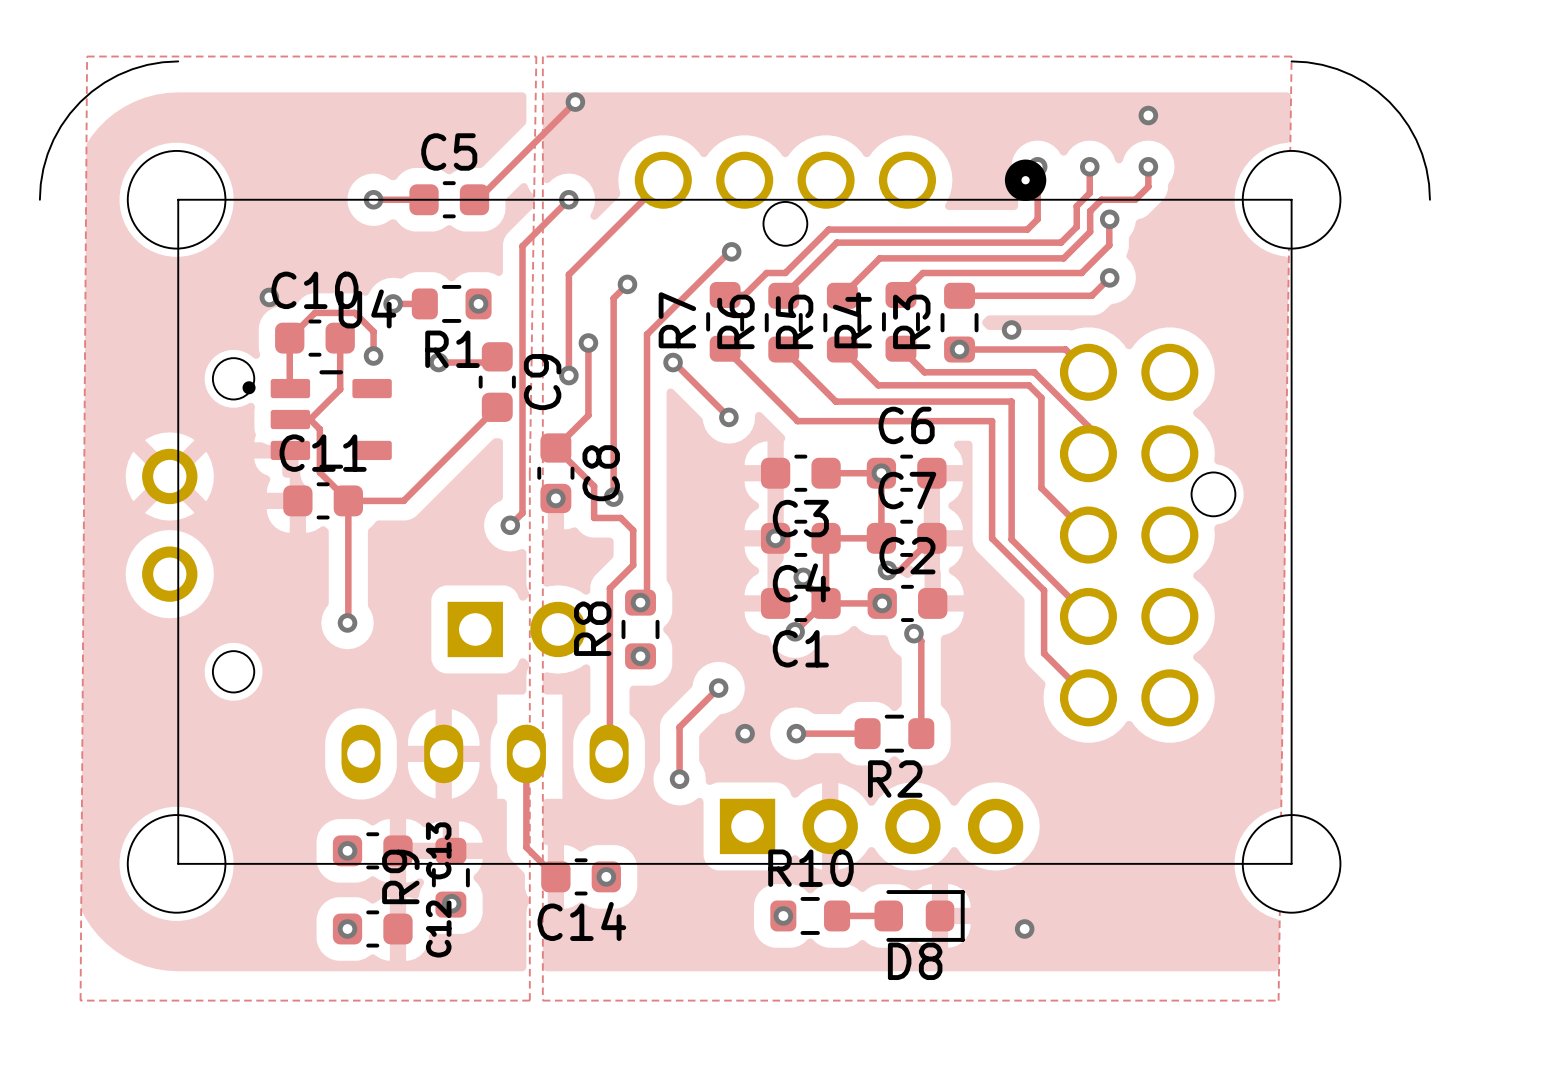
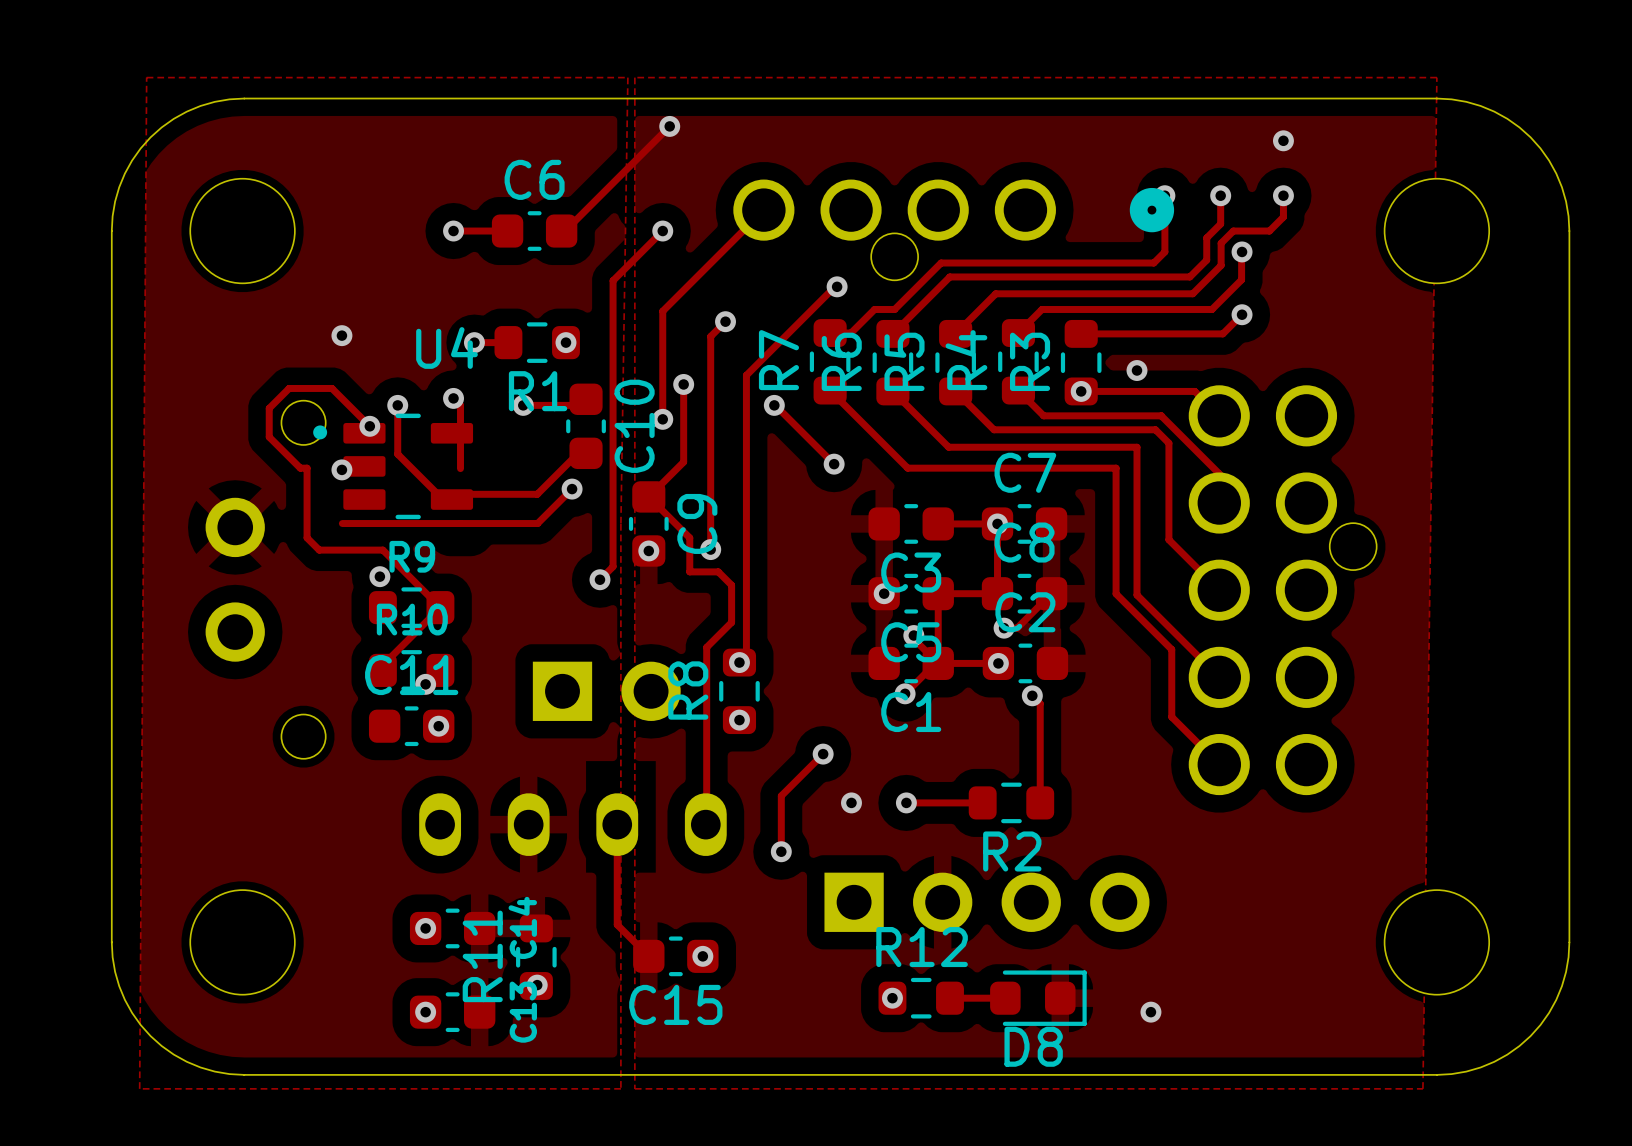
board edge: (178, 61) (147, 64) (118, 75) (91, 91) (80, 101) (61, 126) (47, 154) (40, 184) (39, 199) -> none
board edge: (1291, 61) (1322, 64) (1351, 75) (1365, 82) (1389, 101) (1408, 126) (1416, 139) (1426, 168) (1429, 199) -> none
C5 name: C5 (449, 151) -> C6 (534, 179)
board edge: (178, 199) (1291, 199) (1291, 863) (178, 863) (178, 199) -> (244, 98) (229, 99) (200, 105) (173, 118) (161, 127) (150, 137) (132, 160) (119, 187) (112, 216) (112, 957) (119, 986) (132, 1012) (150, 1036) (173, 1054) (200, 1067) (229, 1074) (244, 1074) (1436, 1074) (1466, 1071) (1494, 1061) (1519, 1046) (1540, 1025) (1549, 1012) (1561, 986) (1566, 971) (1569, 942) (1569, 231) (1566, 201) (1556, 173) (1549, 160) (1530, 137) (1507, 118) (1494, 111) (1466, 101) (1436, 98) (244, 98)
C10: (314, 338) -> none
track: (340, 338) (340, 389) (310, 419) -> none
track: (373, 356) (373, 331) (354, 312) (314, 312) (289, 338) (290, 388) -> (453, 398) (460, 405) (460, 468)
track: none -> (397, 405) (397, 454) (437, 494) (537, 494) (578, 453)
via: none -> (397, 405)
track: none -> (369, 426) (332, 388) (289, 388) (269, 408) (269, 437) (300, 468) (307, 468) (307, 537) (319, 550) (382, 550) (440, 607) (382, 665)
via: none -> (369, 426)
C9 name: C9 (542, 382) -> C10 (634, 426)
track: (497, 407) (403, 500) (348, 500) -> none
track: (310, 419) (319, 429) (319, 472) (348, 500) -> none
via: none -> (341, 469)
C6 name: C6 (906, 425) -> C7 (1025, 472)
track: none -> (572, 489) (537, 523) (342, 523)
via: none -> (572, 489)
C8 name: C8 (601, 473) -> C9 (697, 523)
C7 name: C7 (907, 490) -> C8 (1024, 542)
C11 position: (323, 500) -> (411, 726)
track: (348, 500) (347, 622) -> none
via: none -> (379, 576)
R9: none -> (411, 607)
C4 name: C4 (801, 582) -> C5 (911, 642)
R10: none -> (411, 670)
via: none -> (438, 726)
C13 name: C13 (438, 850) -> C14 (522, 927)
R10 name: R10 (810, 868) -> R12 (922, 947)
R9 name: R9 (400, 876) -> R11 (482, 956)
C14 name: C14 (581, 921) -> C15 (675, 1004)
C12 name: C12 (438, 928) -> C13 (523, 1012)

